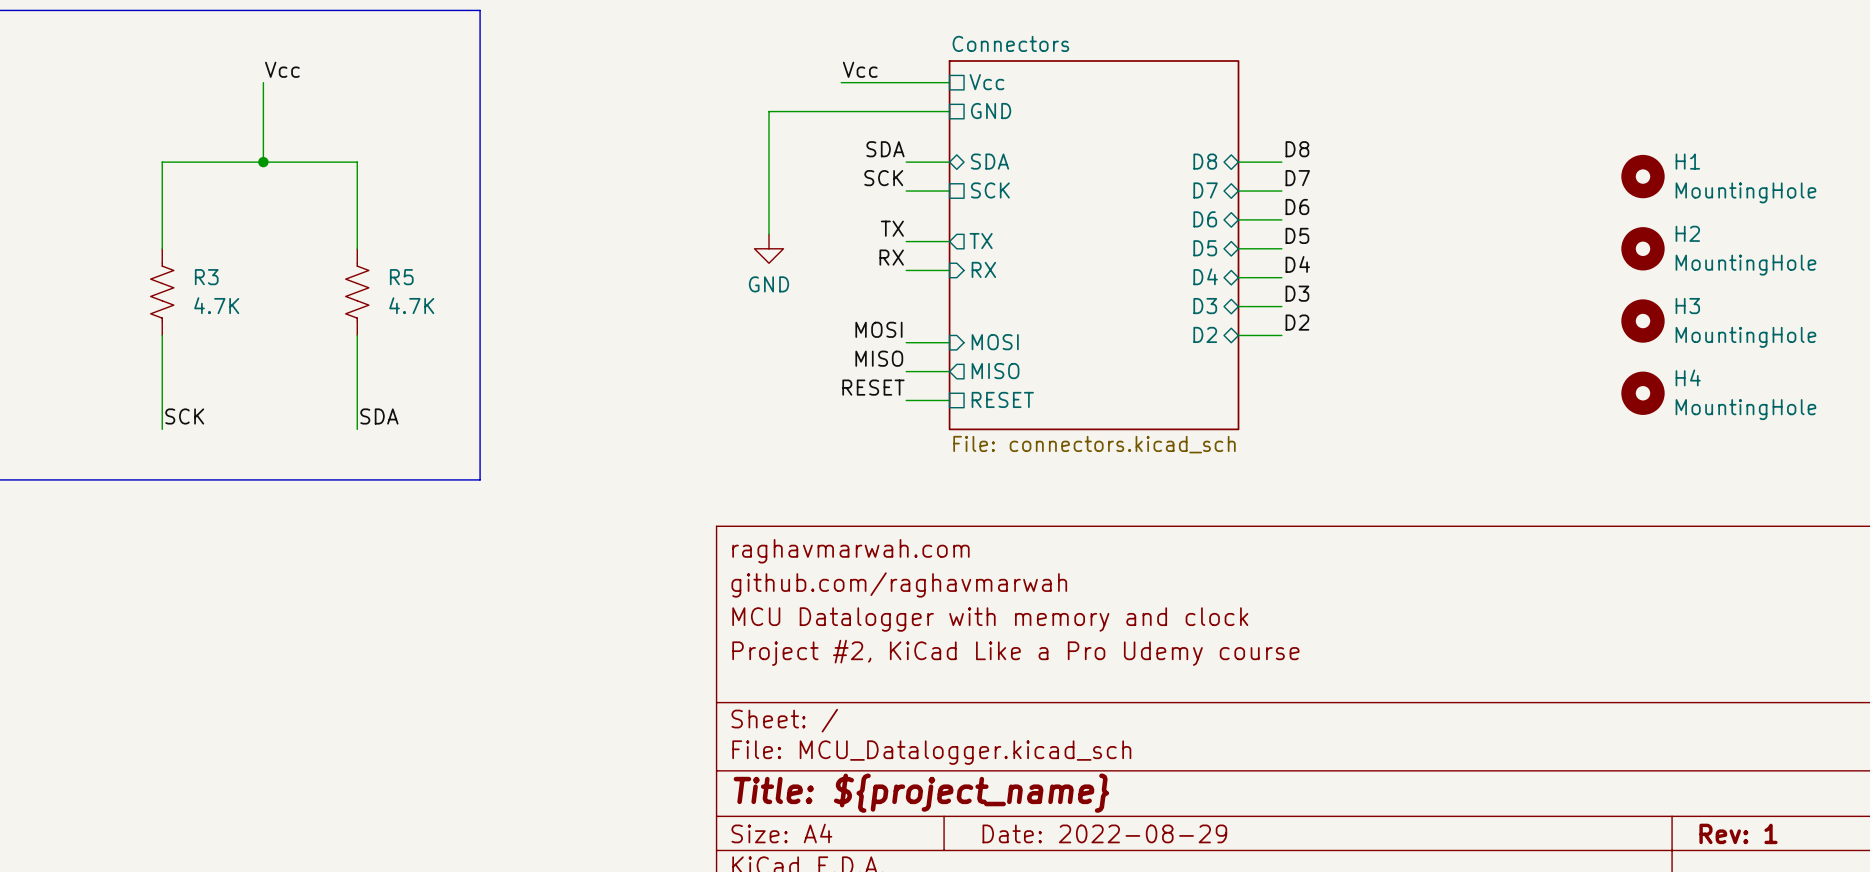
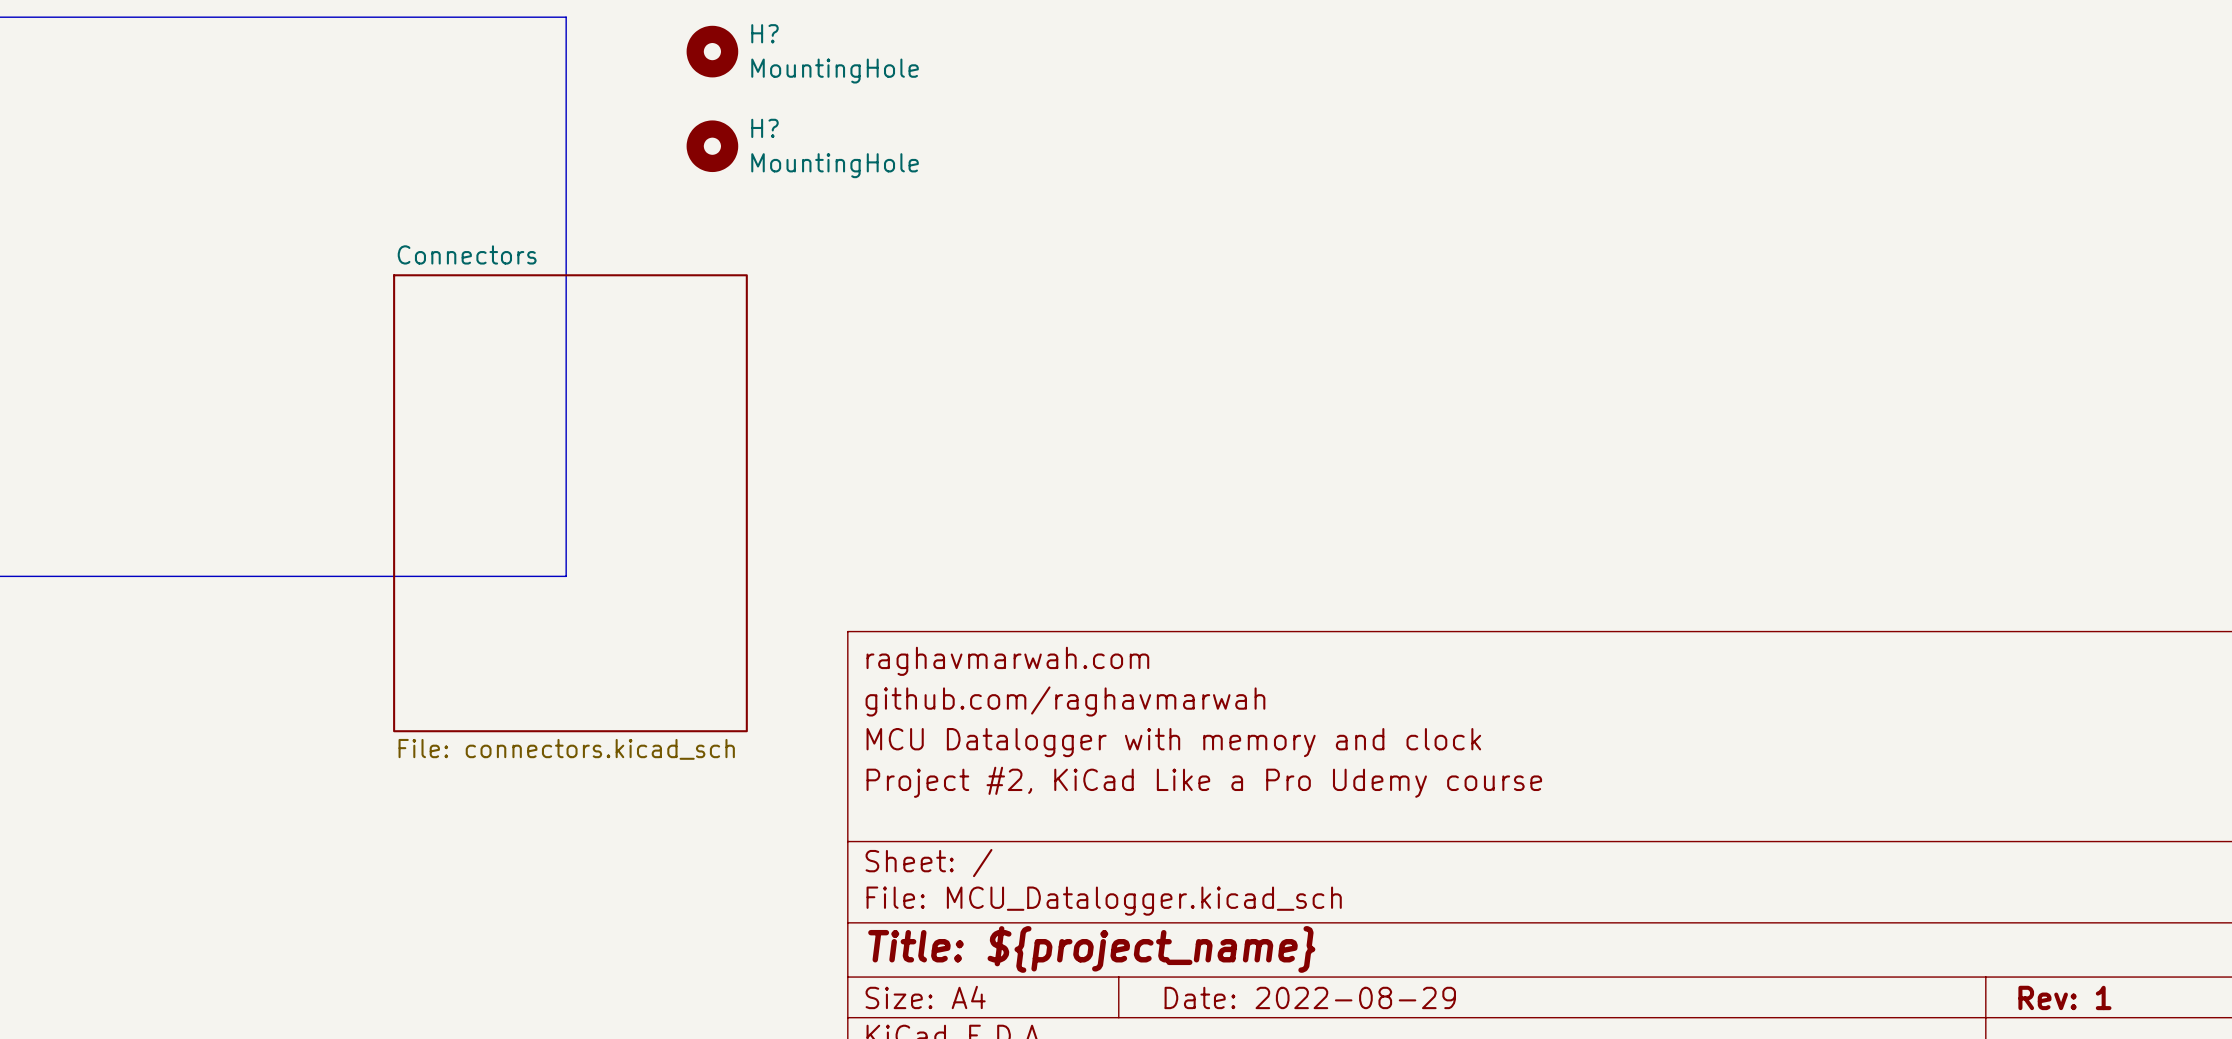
H?: none -> MountingHole (712, 51)
label: Vcc (282, 69) -> none
label: Vcc (860, 69) -> none
wire: (263, 82) (263, 162) -> none
wire: (841, 82) (949, 82) -> none
sheet pin: Vcc (986, 82) -> none
wire: (949, 111) (768, 111) (768, 234) -> none
sheet pin: GND (991, 111) -> none
H?: none -> MountingHole (712, 146)
label: SDA (885, 149) -> none
label: D8 (1297, 149) -> none
sheet pin: SDA (990, 161) -> none
sheet pin: D8 (1205, 161) -> none
junction: (263, 162) -> none
wire: (906, 162) (949, 162) -> none
wire: (1238, 162) (1281, 162) -> none
H1: MountingHole (1642, 176) -> none
label: SCK (883, 178) -> none
label: D7 (1297, 178) -> none
sheet pin: SCK (990, 190) -> none
sheet pin: D7 (1205, 190) -> none
wire: (906, 191) (949, 191) -> none
wire: (1238, 191) (1281, 191) -> none
label: D6 (1297, 207) -> none
sheet pin: D6 (1205, 219) -> none
wire: (1238, 219) (1281, 219) -> none
label: TX (892, 228) -> none
label: D5 (1297, 235) -> none
wire: (906, 241) (949, 241) -> none
sheet pin: TX (981, 241) -> none
sheet Connectors: File: connectors.kicad_sch (1094, 245) -> none
wire: (162, 248) (162, 162) (357, 162) (357, 248) -> none
power symbol: GND (768, 248) -> none
sheet pin: D5 (1205, 248) -> none
wire: (1238, 248) (1281, 248) -> none
H2: MountingHole (1642, 248) -> none
label: RX (891, 257) -> none
label: D4 (1297, 264) -> none
sheet pin: RX (983, 269) -> none
wire: (906, 270) (949, 270) -> none
sheet pin: D4 (1205, 276) -> none
wire: (1238, 277) (1281, 277) -> none
R3: 4.7K (162, 292) -> none
R5: 4.7K (357, 292) -> none
label: D3 (1297, 293) -> none
sheet pin: D3 (1205, 306) -> none
wire: (1238, 306) (1281, 306) -> none
H3: MountingHole (1642, 321) -> none
label: D2 (1297, 322) -> none
label: MOSI (878, 329) -> none
sheet pin: D2 (1205, 334) -> none
wire: (162, 335) (162, 429) -> none
wire: (357, 335) (357, 429) -> none
wire: (1238, 335) (1281, 335) -> none
wire: (906, 342) (949, 342) -> none
sheet pin: MOSI (995, 342) -> none
label: MISO (879, 358) -> none
wire: (906, 371) (949, 371) -> none
sheet pin: MISO (995, 371) -> none
label: RESET (873, 387) -> none
H4: MountingHole (1642, 393) -> none
sheet pin: RESET (1002, 399) -> none
wire: (906, 400) (949, 400) -> none
label: SCK (184, 416) -> none
label: SDA (379, 416) -> none
sheet Connectors: none -> File: connectors.kicad_sch (570, 503)

